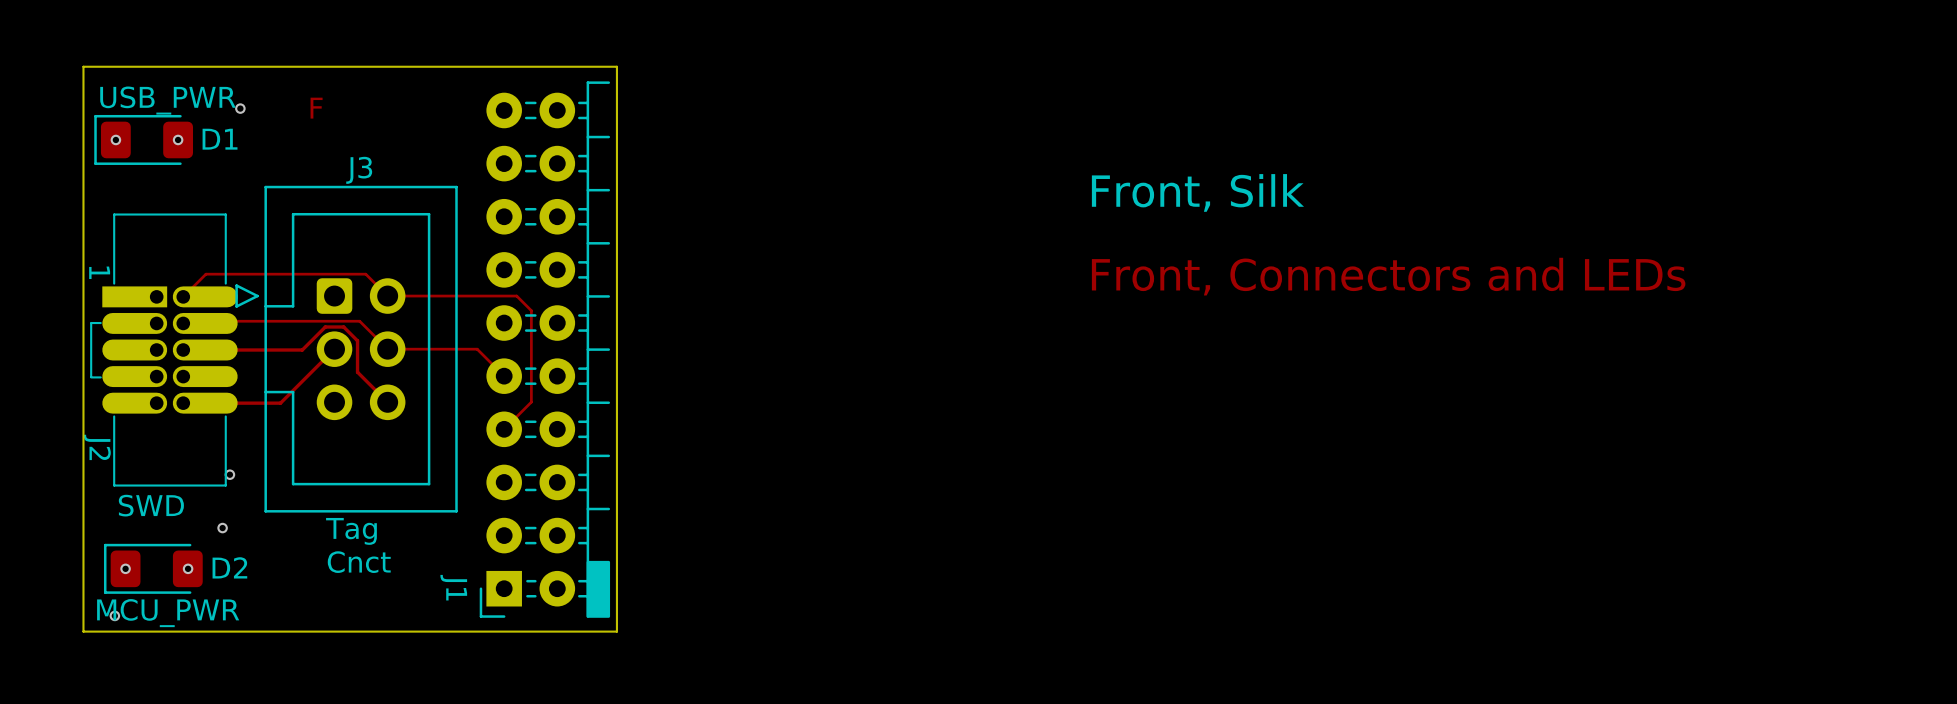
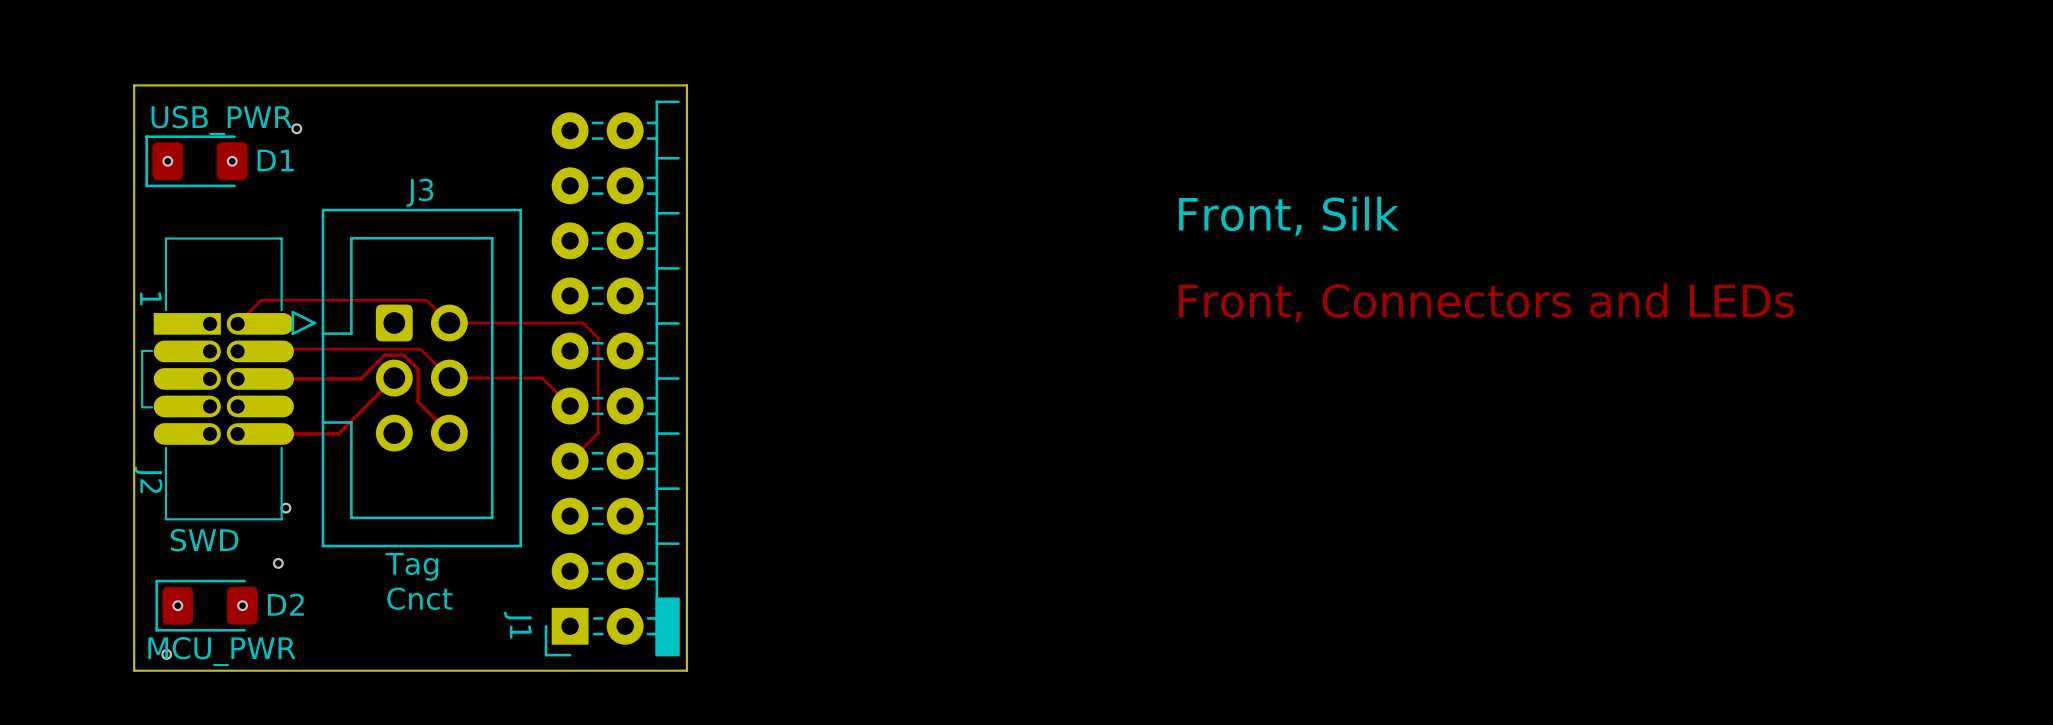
drawing: [310, 97, 323, 119] -> none

